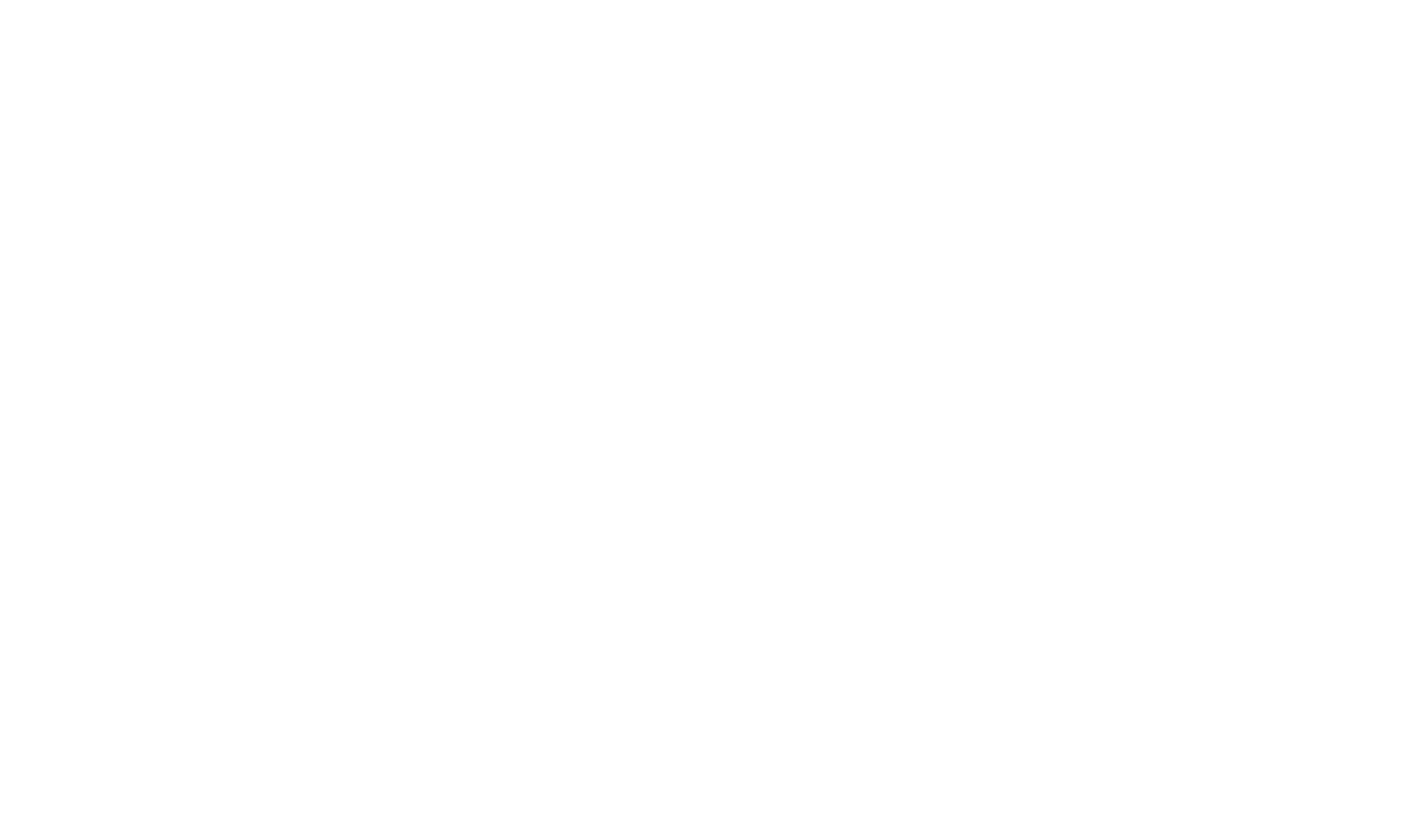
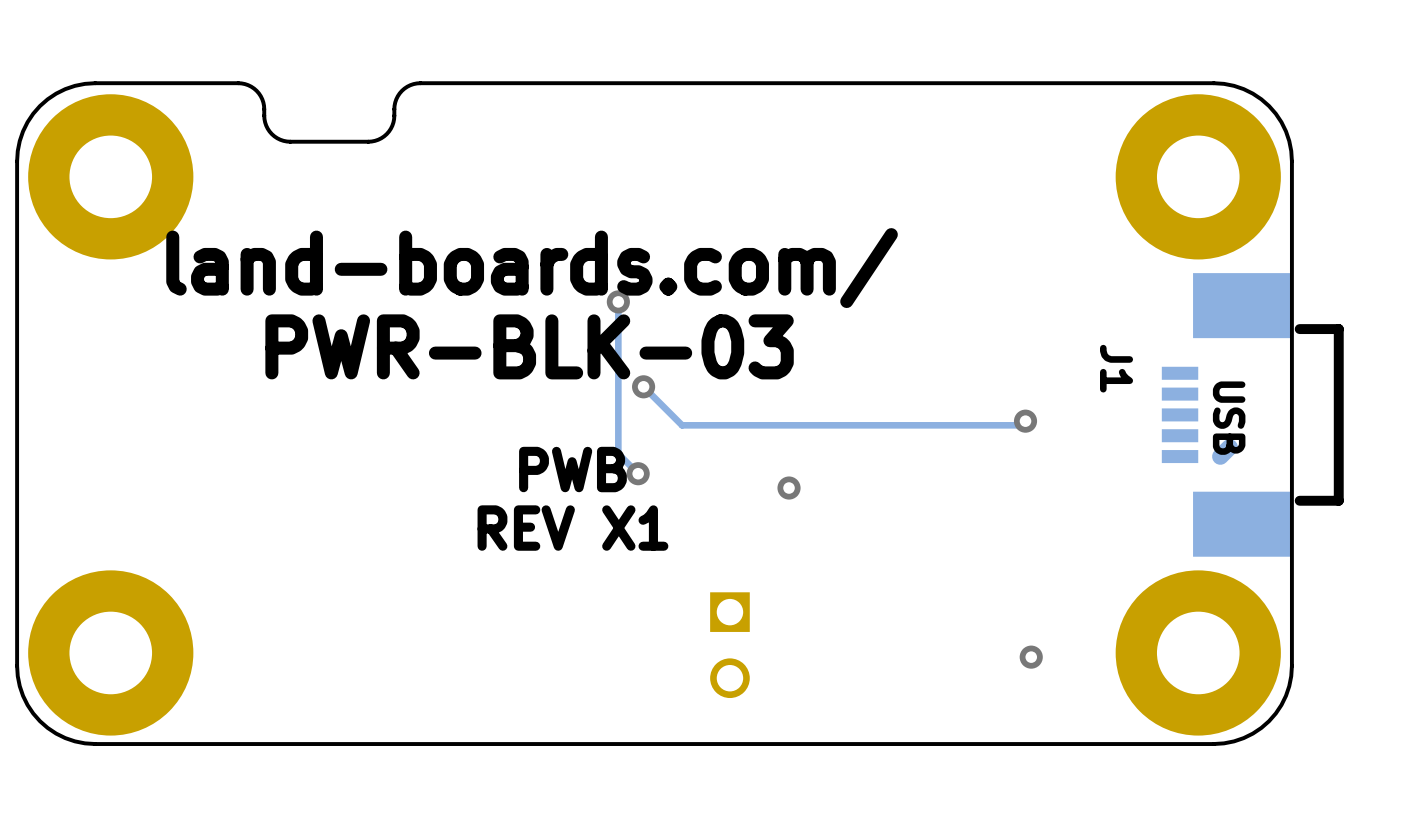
board edge: none -> (1213, 83) (416, 83) (404, 88) (397, 96) (394, 105) (393, 122) (388, 131) (378, 139) (368, 141) (290, 141) (280, 139) (271, 134) (266, 125) (263, 102) (258, 93) (251, 86) (241, 83) (95, 83) (74, 85) (56, 93) (39, 106) (27, 122) (19, 141) (17, 161) (17, 665) (19, 686) (27, 705) (39, 721) (56, 733) (74, 741) (95, 744) (1213, 744) (1234, 741) (1252, 733) (1269, 721) (1281, 705) (1291, 676) (1291, 161) (1285, 131) (1269, 106) (1243, 89) (1213, 83)
part: none -> (110, 176)
part: none -> (1198, 176)
text: none -> land-boards.com/ (532, 268)
track: none -> (618, 301) (618, 453) (638, 473)
via: none -> (618, 301)
text: none -> PWR-BLK-03 (529, 346)
track: none -> (643, 386) (682, 425) (1021, 425) (1025, 421)
via: none -> (643, 386)
J1: none -> (1252, 414)
text: none -> USB (1229, 418)
via: none -> (1025, 421)
track: none -> (1229, 447) (1220, 456) (1229, 447)
text: none -> PWB (572, 469)
via: none -> (638, 473)
via: none -> (789, 488)
text: none -> REV X1 (572, 528)
part: none -> (729, 645)
part: none -> (110, 652)
part: none -> (1198, 652)
via: none -> (1031, 657)

